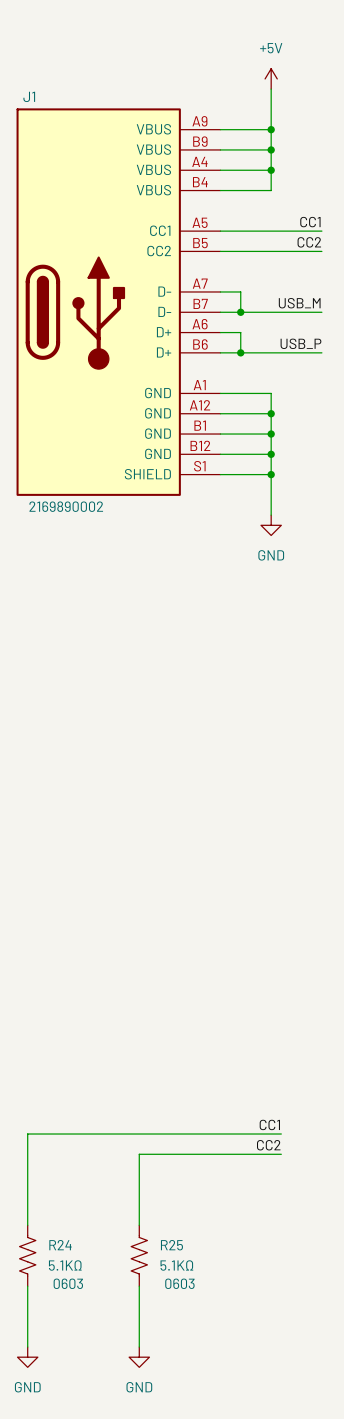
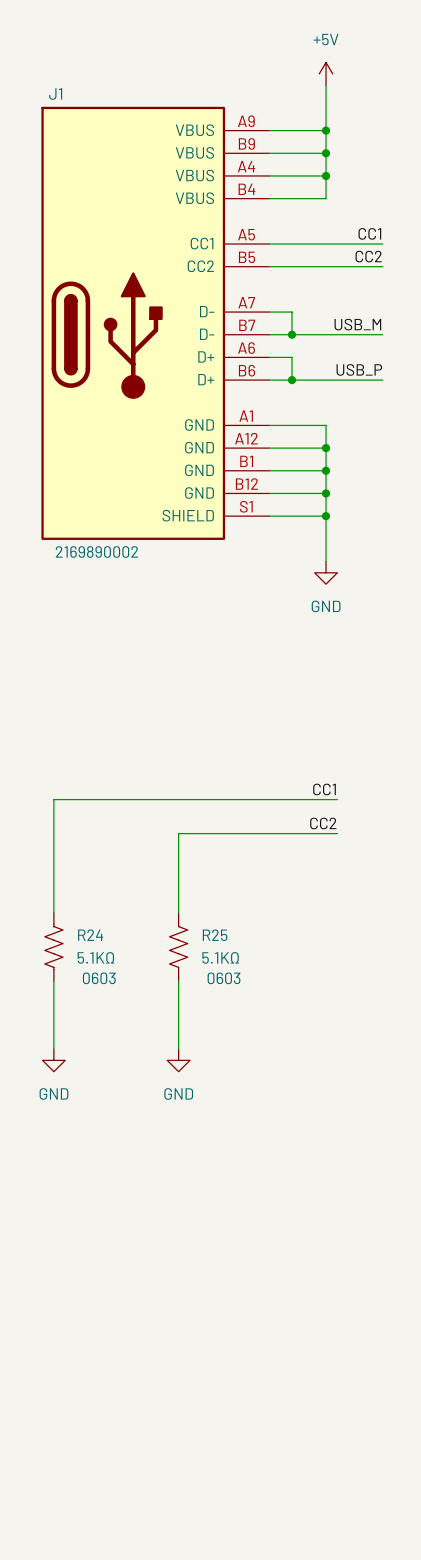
label: none -> CC1 (324, 789)
wire: none -> (337, 799) (53, 799) (53, 912)
label: none -> CC2 (323, 823)
wire: none -> (337, 833) (178, 833) (178, 912)
wire: none -> (53, 981) (53, 1049)
wire: none -> (178, 981) (178, 1049)
power symbol: none -> GND (53, 1060)
power symbol: none -> GND (178, 1060)
label: CC1 (269, 1124) -> none
wire: (281, 1134) (27, 1134) (27, 1225) -> none
label: CC2 (268, 1145) -> none
wire: (281, 1154) (139, 1154) (139, 1225) -> none
R24 position: (27, 1255) -> (53, 946)
R25 position: (139, 1255) -> (178, 946)
wire: (27, 1286) (27, 1347) -> none
wire: (139, 1286) (139, 1347) -> none
power symbol: GND (27, 1357) -> none
power symbol: GND (139, 1357) -> none

